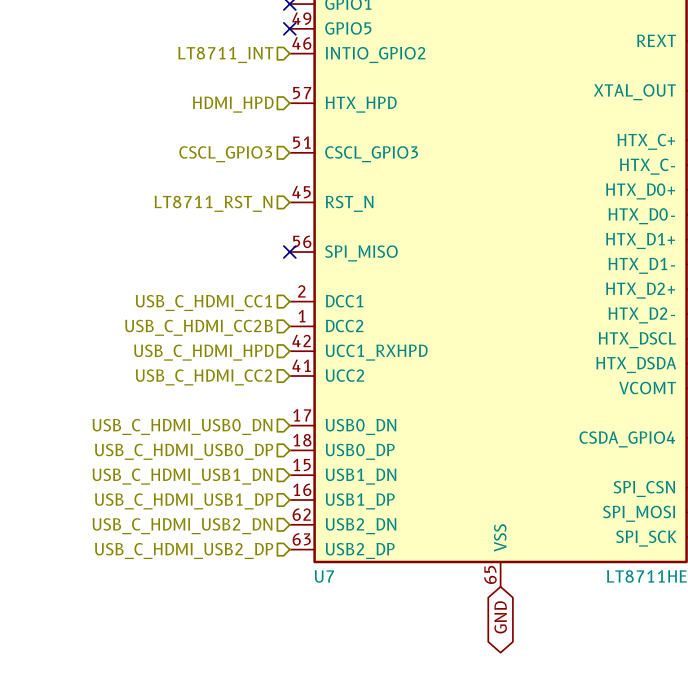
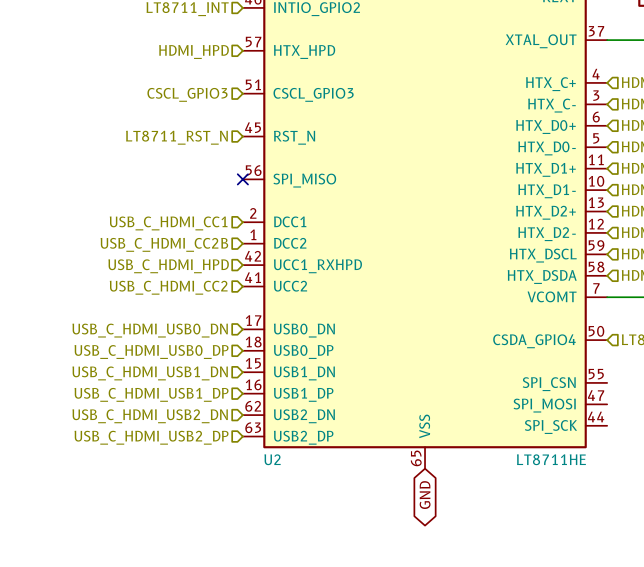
U7 name: U7 (324, 576) -> U2 (272, 459)

